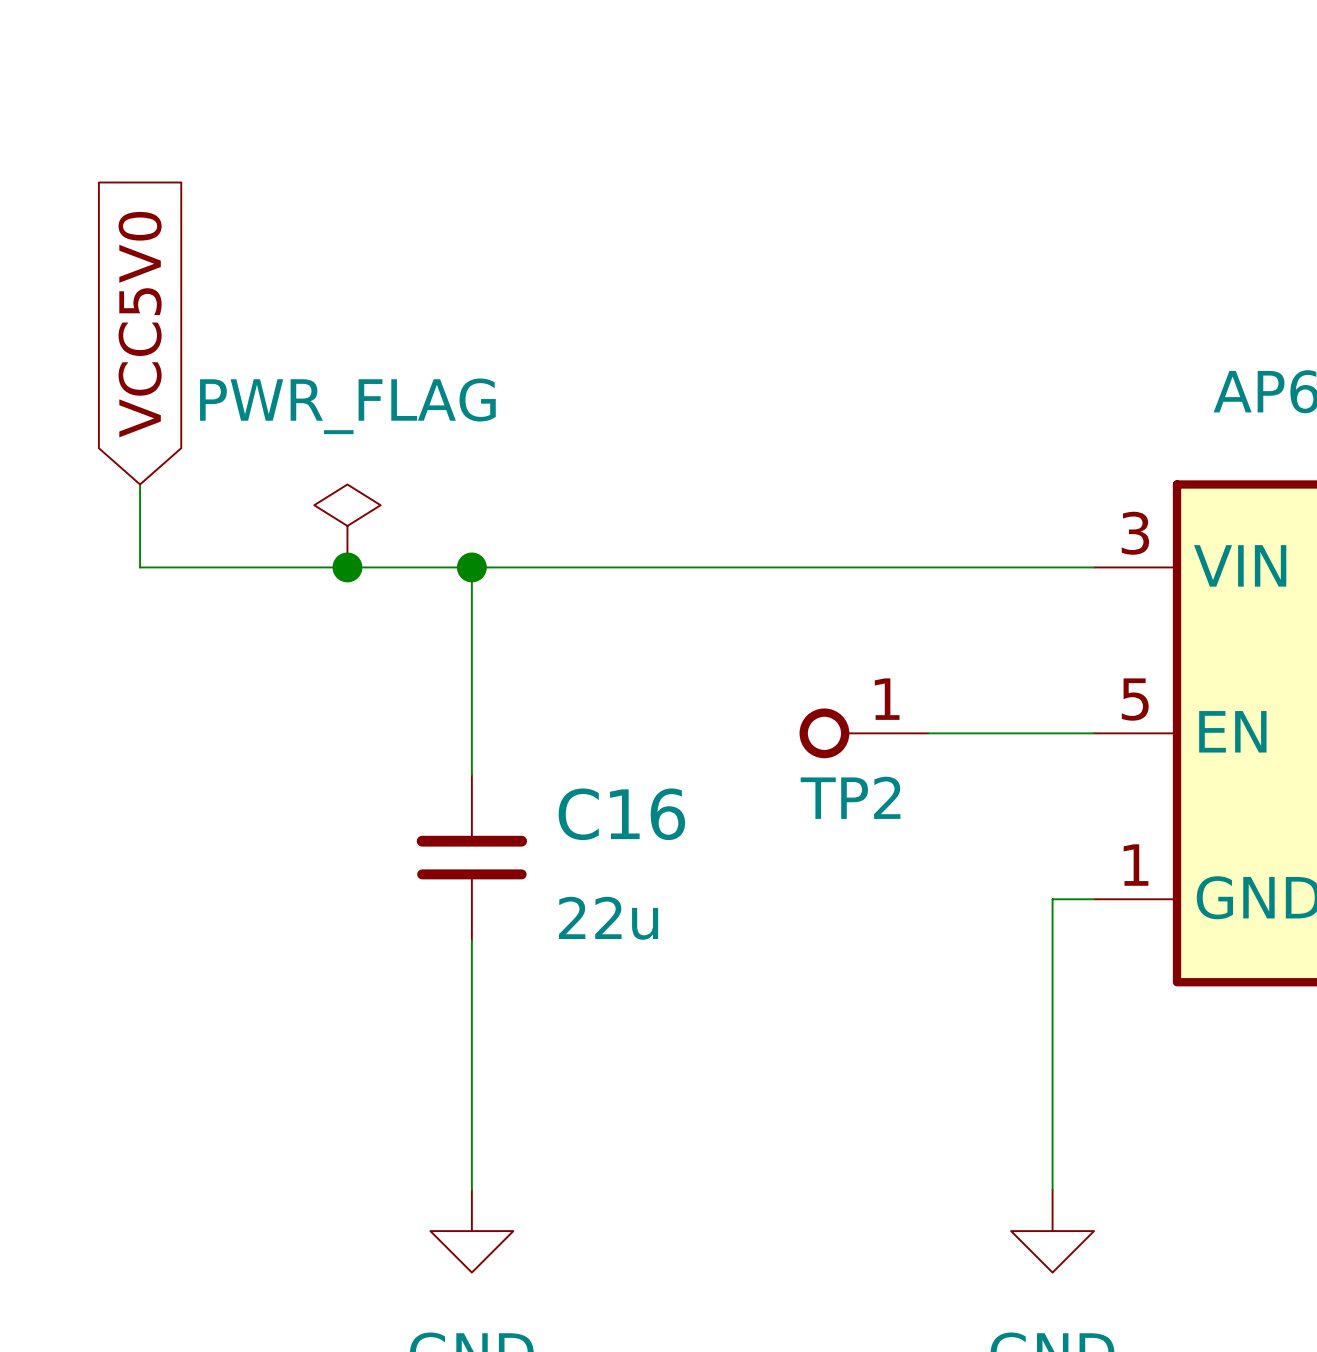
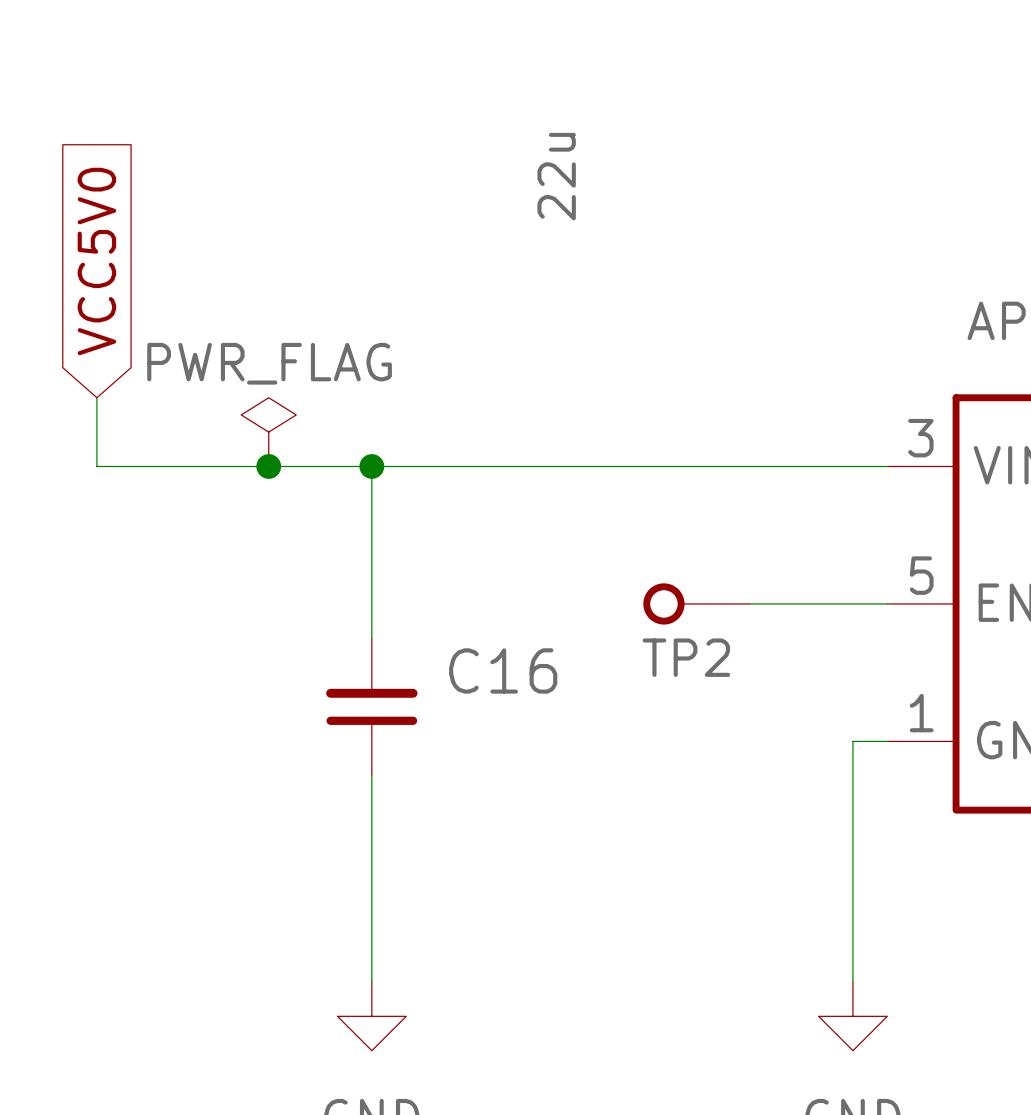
power symbol text position: PWR_FLAG (347, 406) -> PWR_FLAG (269, 363)
TP2 pin number: 1 (887, 699) -> none
C16 text rotation: 0° (608, 918) -> 90° counterclockwise (556, 176)
C16 text position: 22u (608, 918) -> 22u (556, 176)

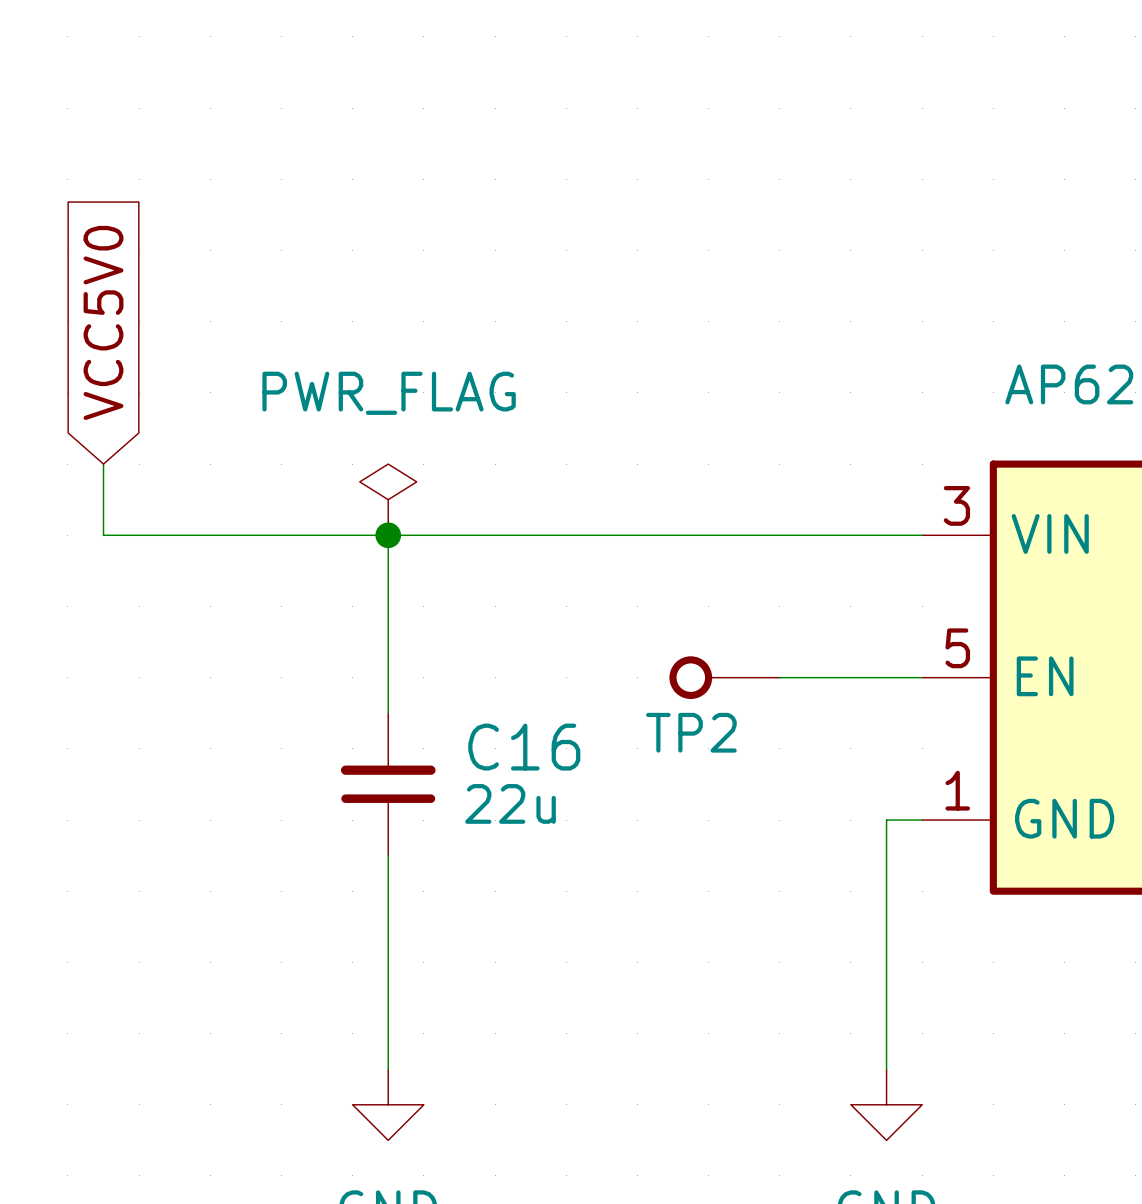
C16 text rotation: 0° (556, 176) -> 90° clockwise (510, 803)
C16 text position: 22u (556, 176) -> 22u (510, 803)
power symbol text position: PWR_FLAG (269, 363) -> PWR_FLAG (389, 393)
power symbol position: PWR_FLAG (268, 432) -> PWR_FLAG (388, 499)
junction: (268, 466) -> none
TP2 name position: TP2 (686, 657) -> TP2 (691, 732)

